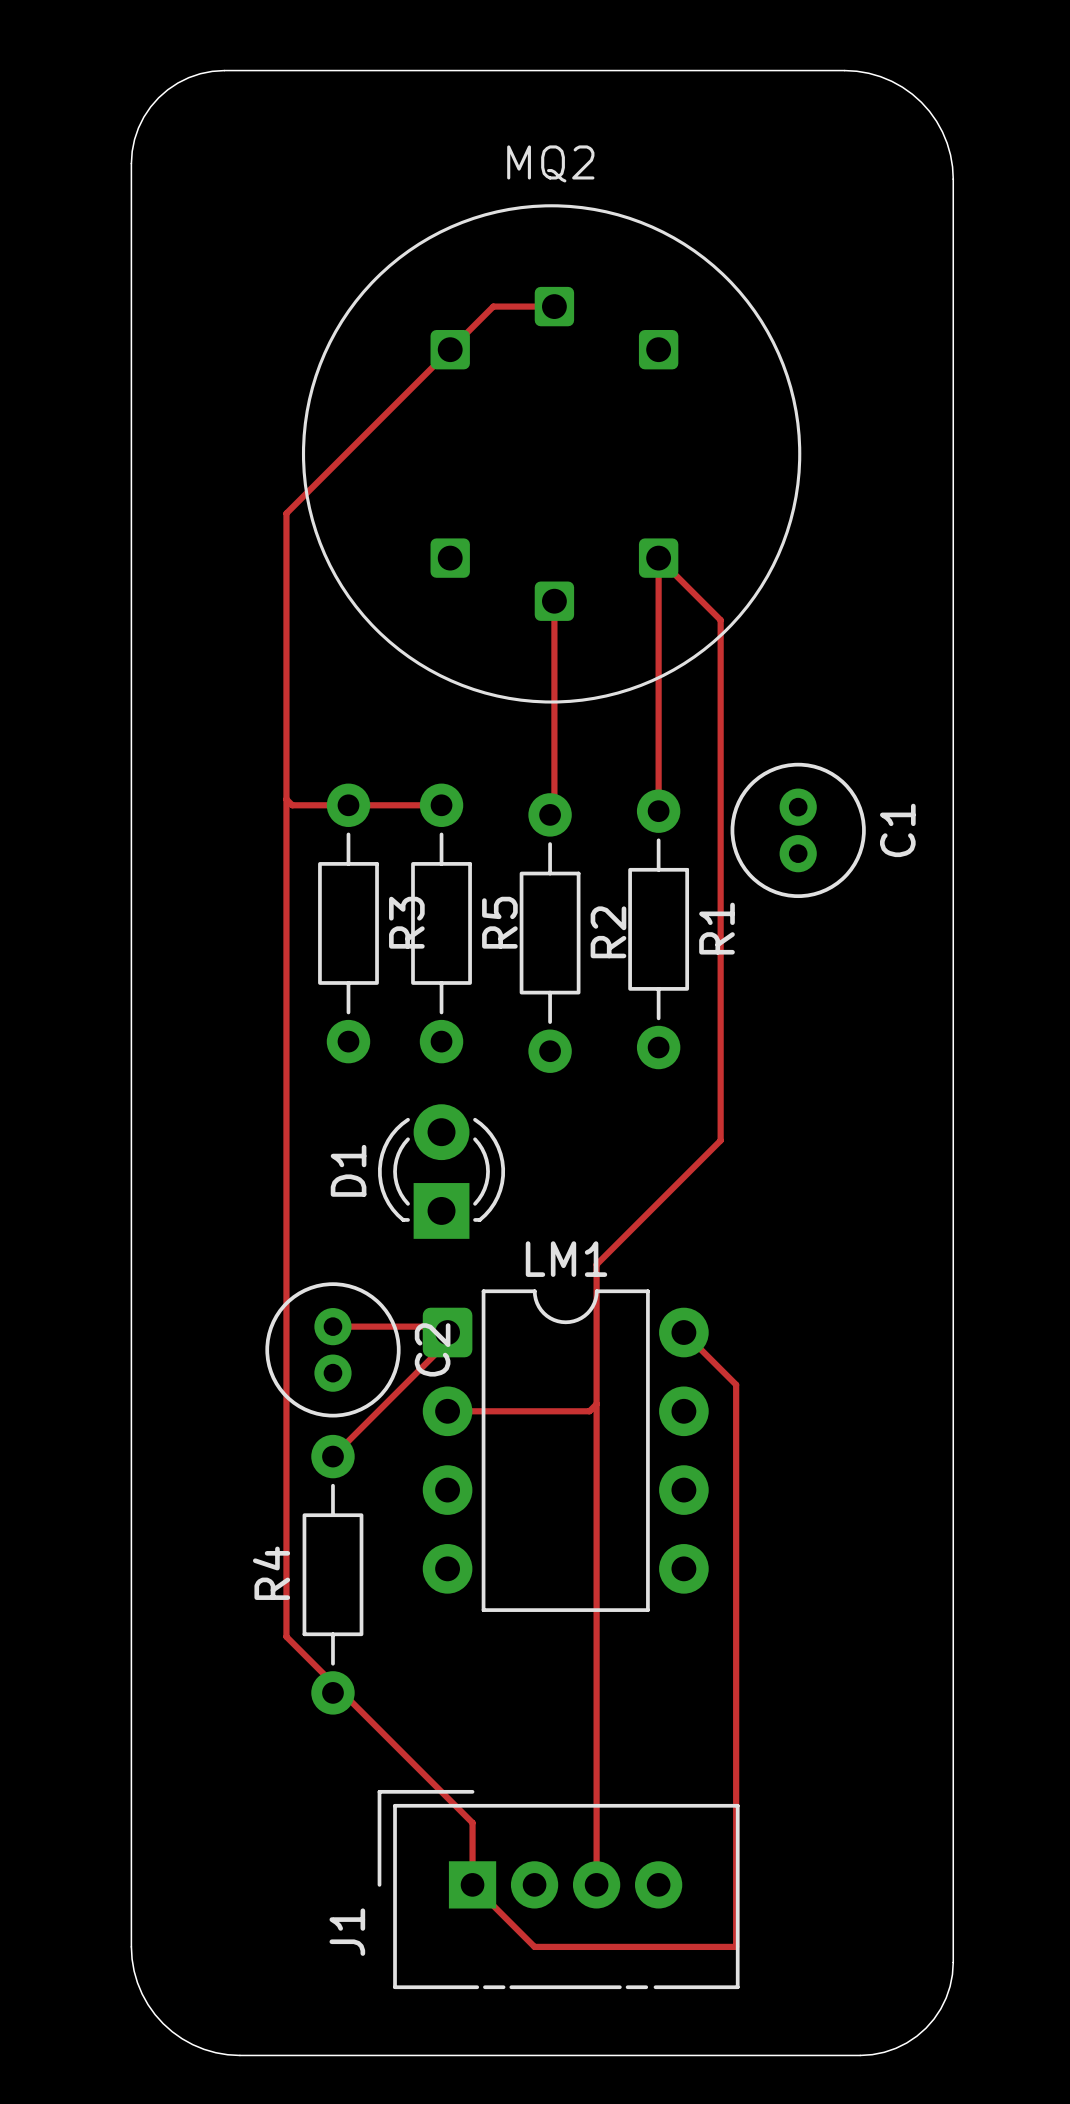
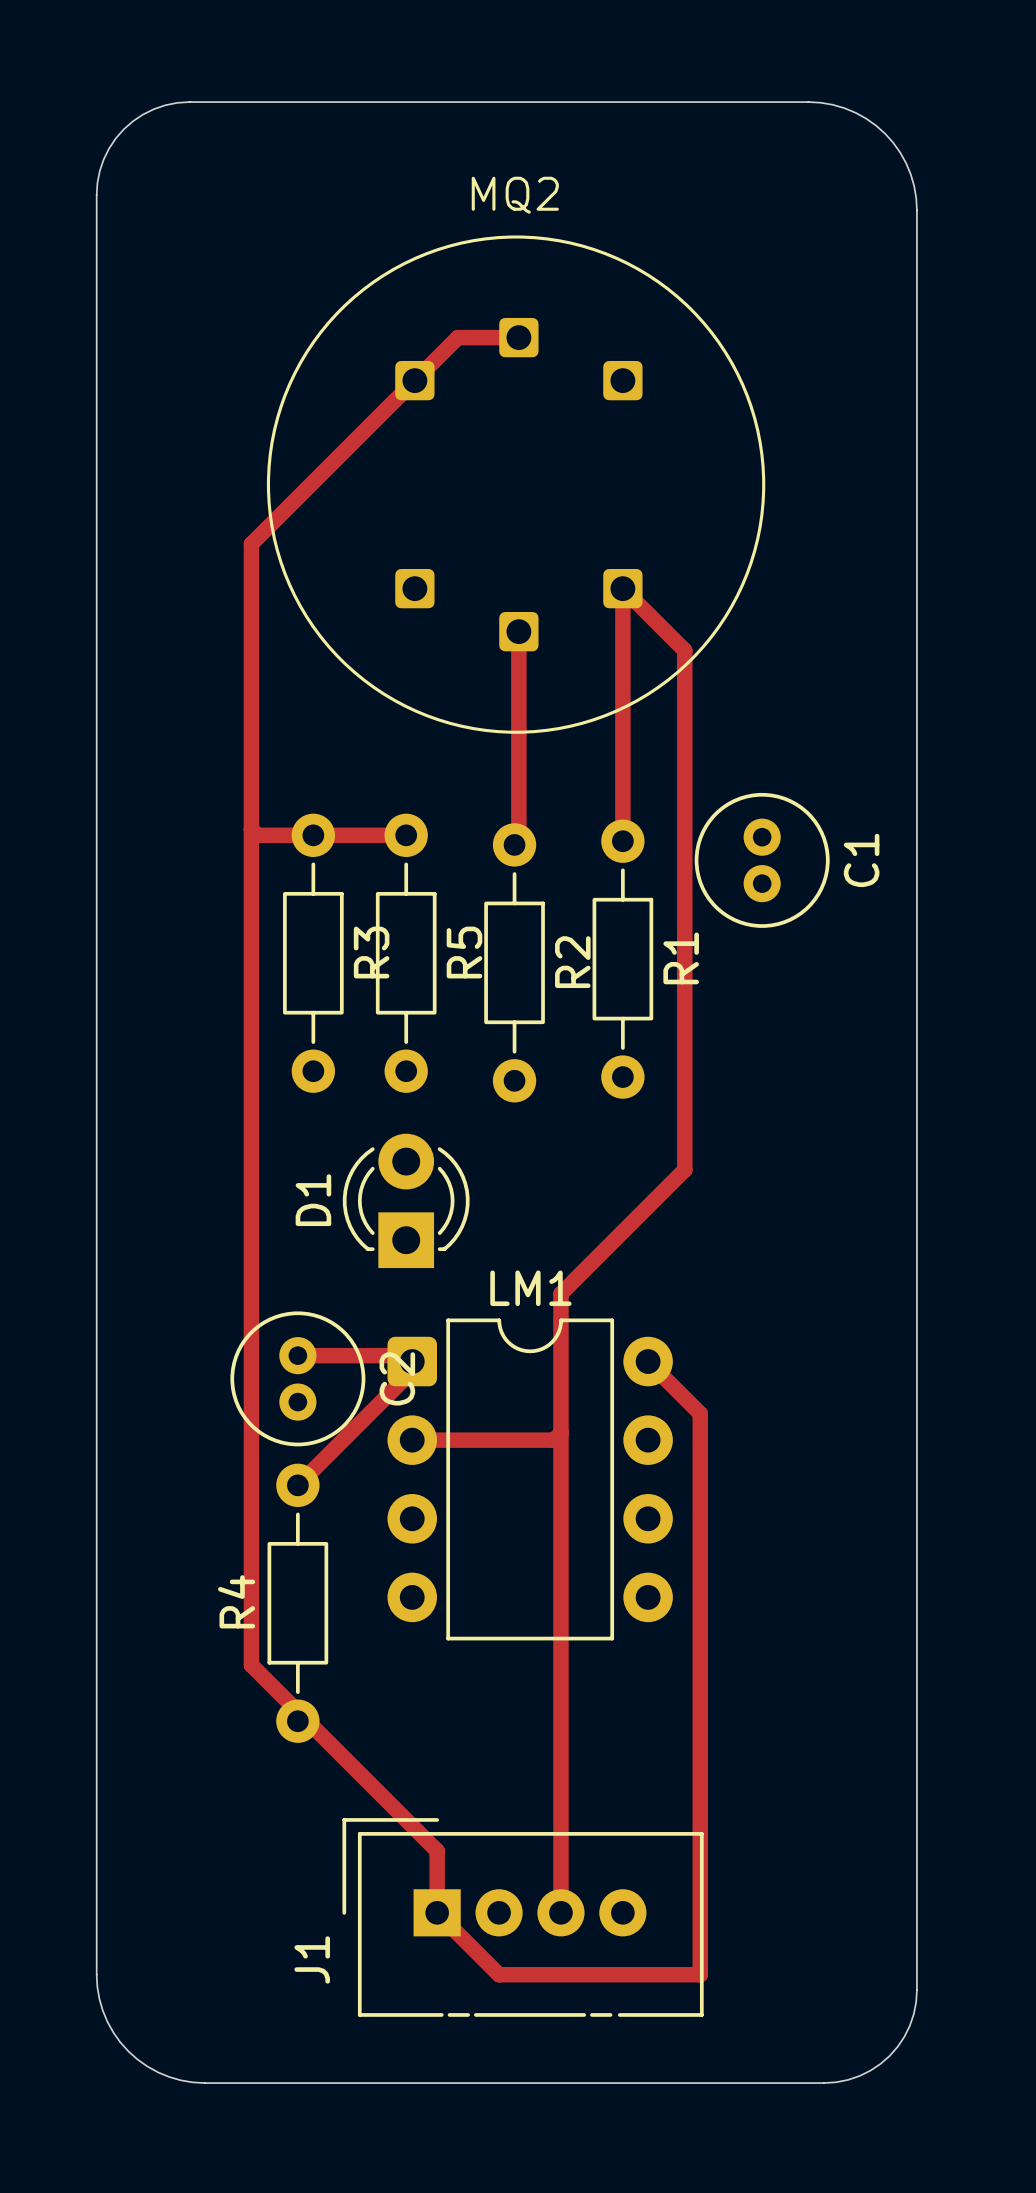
track width: thin (554, 306) (493, 306) (286, 513) (286, 1636) (472, 1822) (472, 1884) (534, 1946) (736, 1946) (736, 1384) (683, 1332) -> thick (518, 337) (457, 337) (251, 544) (251, 1665) (437, 1850) (437, 1912) (499, 1974) (700, 1974) (700, 1413) (648, 1361)
track width: thin (554, 601) (554, 810) (550, 814) -> thick (518, 631) (518, 840) (514, 844)
track width: thin (286, 799) (292, 805) (441, 805) -> thick (251, 829) (257, 835) (406, 835)
track width: thin (658, 811) (658, 558) (720, 620) (720, 1140) (596, 1264) (596, 1884) -> thick (622, 841) (622, 588) (684, 650) (684, 1169) (560, 1293) (560, 1912)
track width: thin (332, 1326) (441, 1326) (447, 1332) (447, 1341) (332, 1456) -> thick (297, 1355) (406, 1355) (412, 1361) (412, 1370) (297, 1485)
track width: thin (596, 1404) (589, 1411) (447, 1411) -> thick (560, 1433) (553, 1440) (412, 1440)

